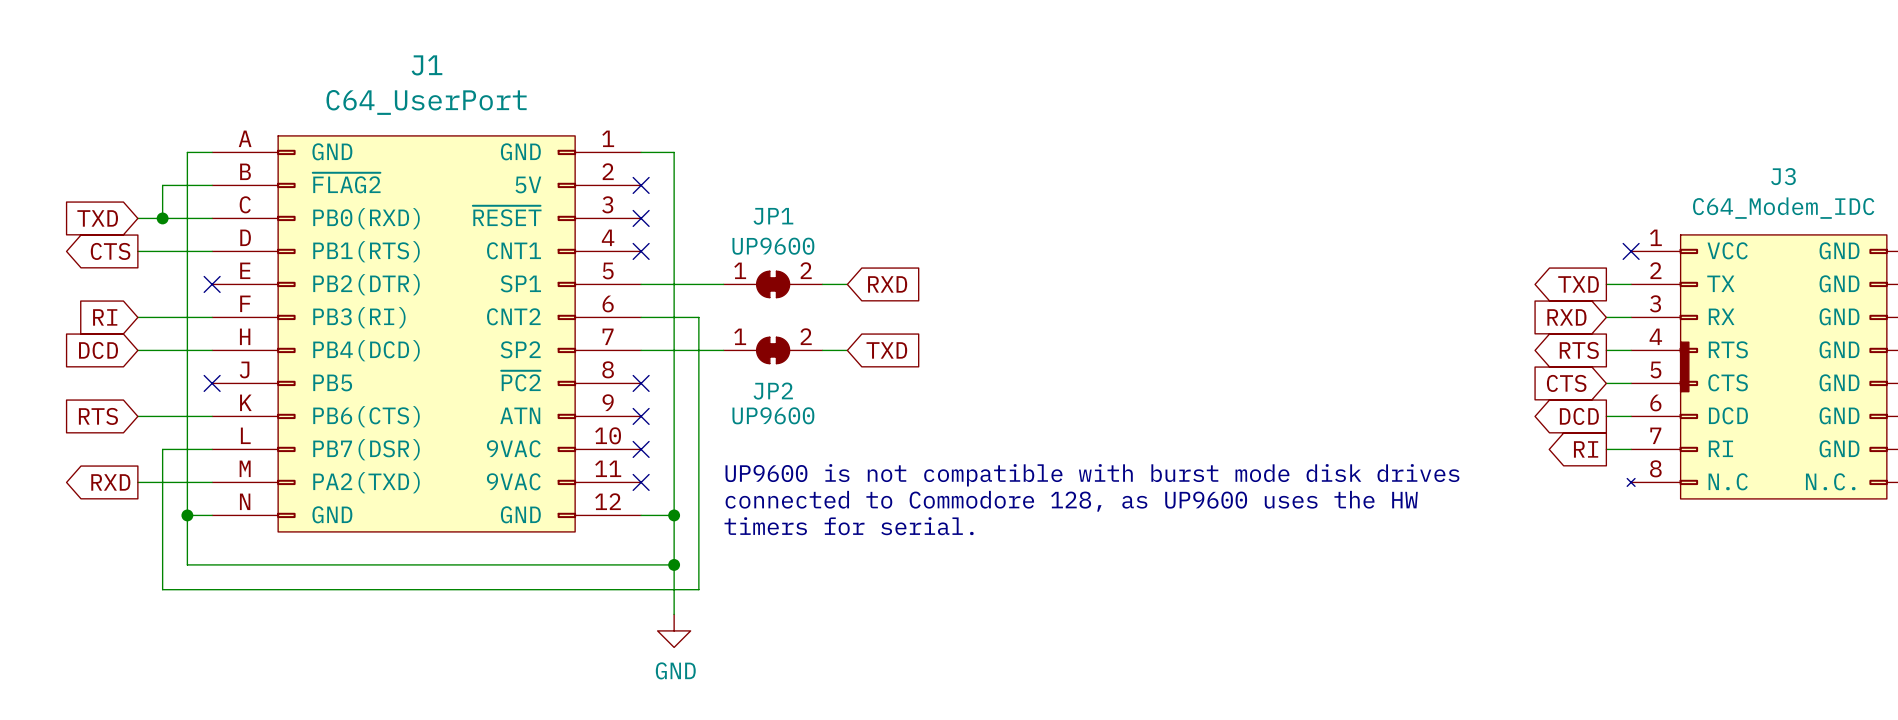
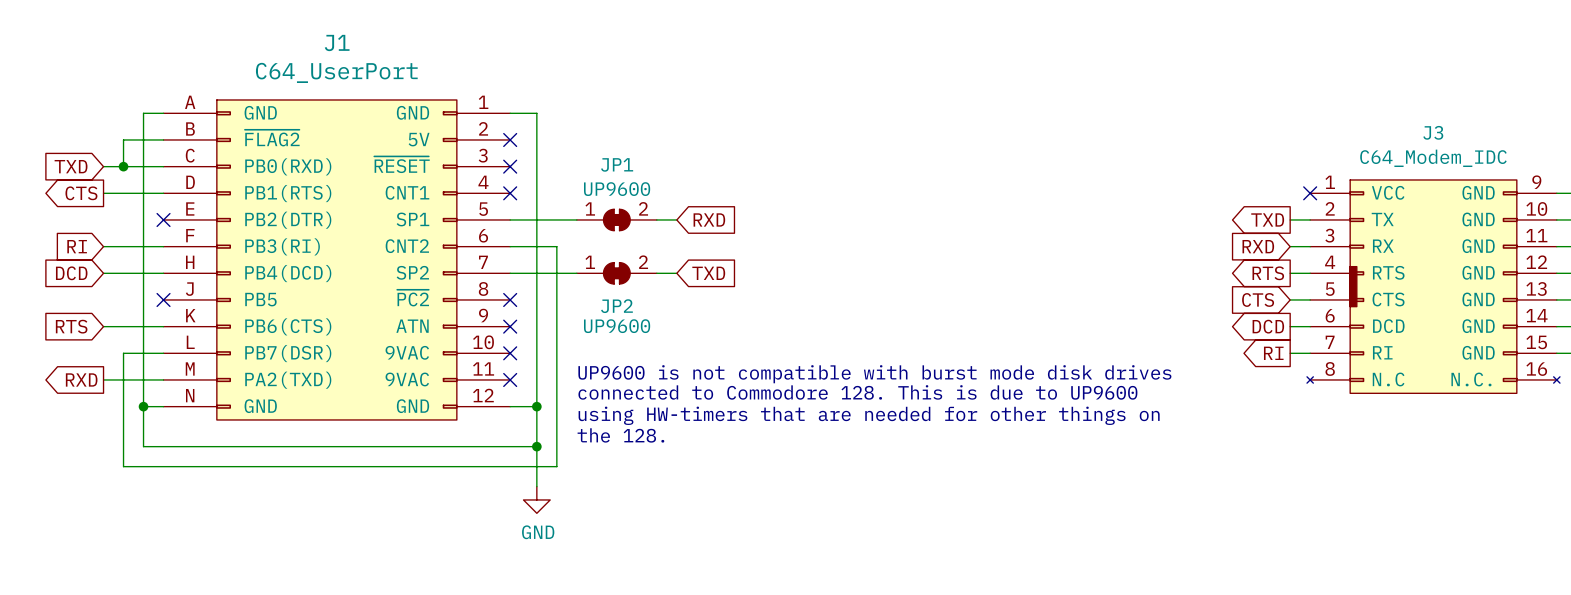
text: connected to Commodore 128, as UP9600 uses the HW (1071, 501) -> connected to Commodore 128. This is due to UP9600 (857, 392)
text: timers for serial. (849, 526) -> using HW-timers that are needed for other things on (869, 415)
text: none -> the 128. (620, 435)

